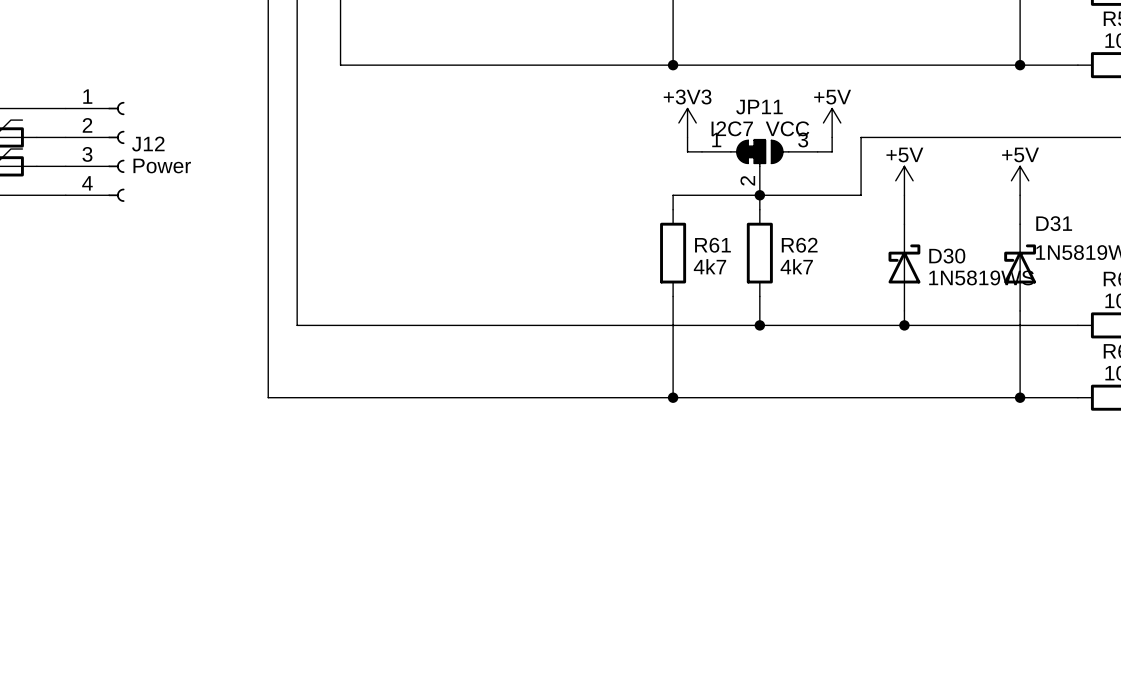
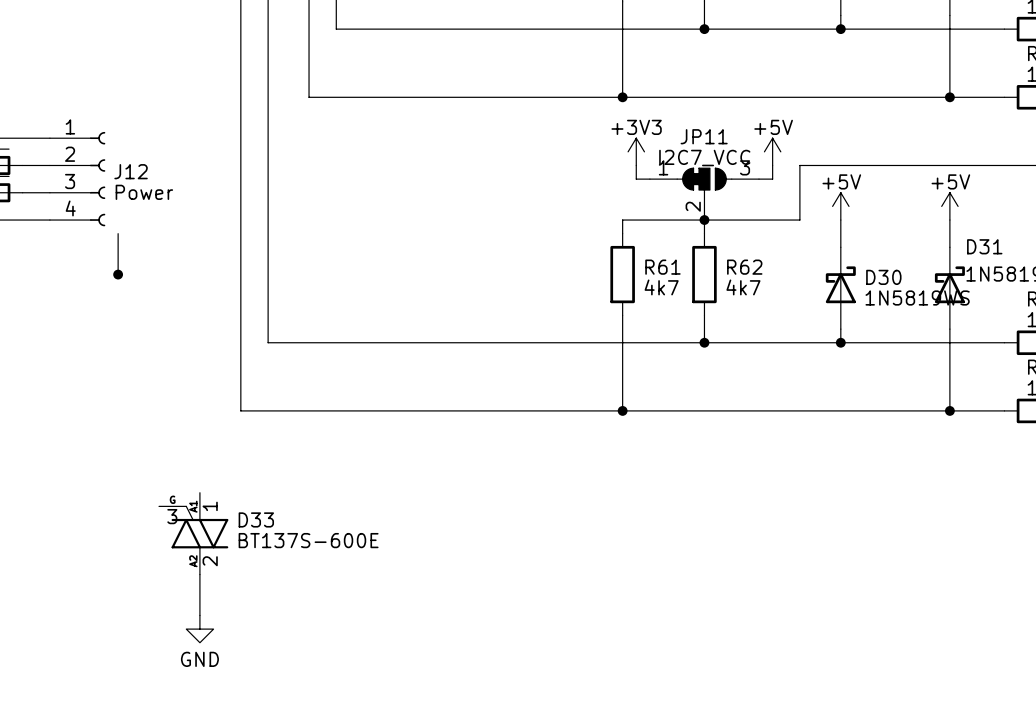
wire: none -> (118, 233) (118, 274)
junction: none -> (118, 274)
D33: none -> BT137S-600E (193, 533)
wire: none -> (199, 574) (199, 615)
power symbol: none -> GND (199, 629)

